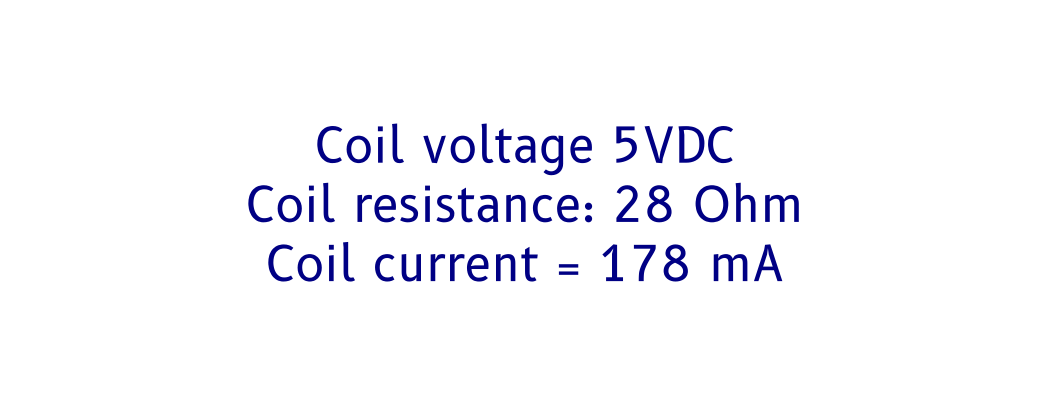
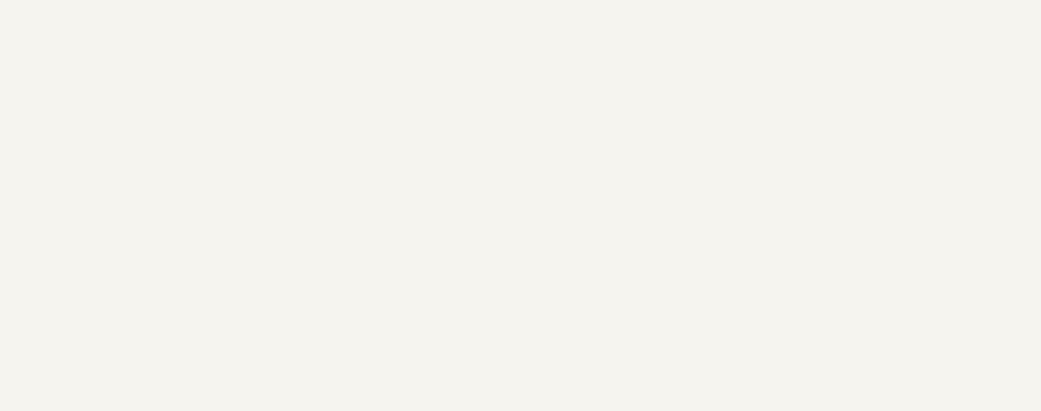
text: Coil voltage 5VDC (525, 149) -> none
text: Coil resistance: 28 Ohm (523, 202) -> none
text: Coil current = 178 mA (525, 261) -> none

